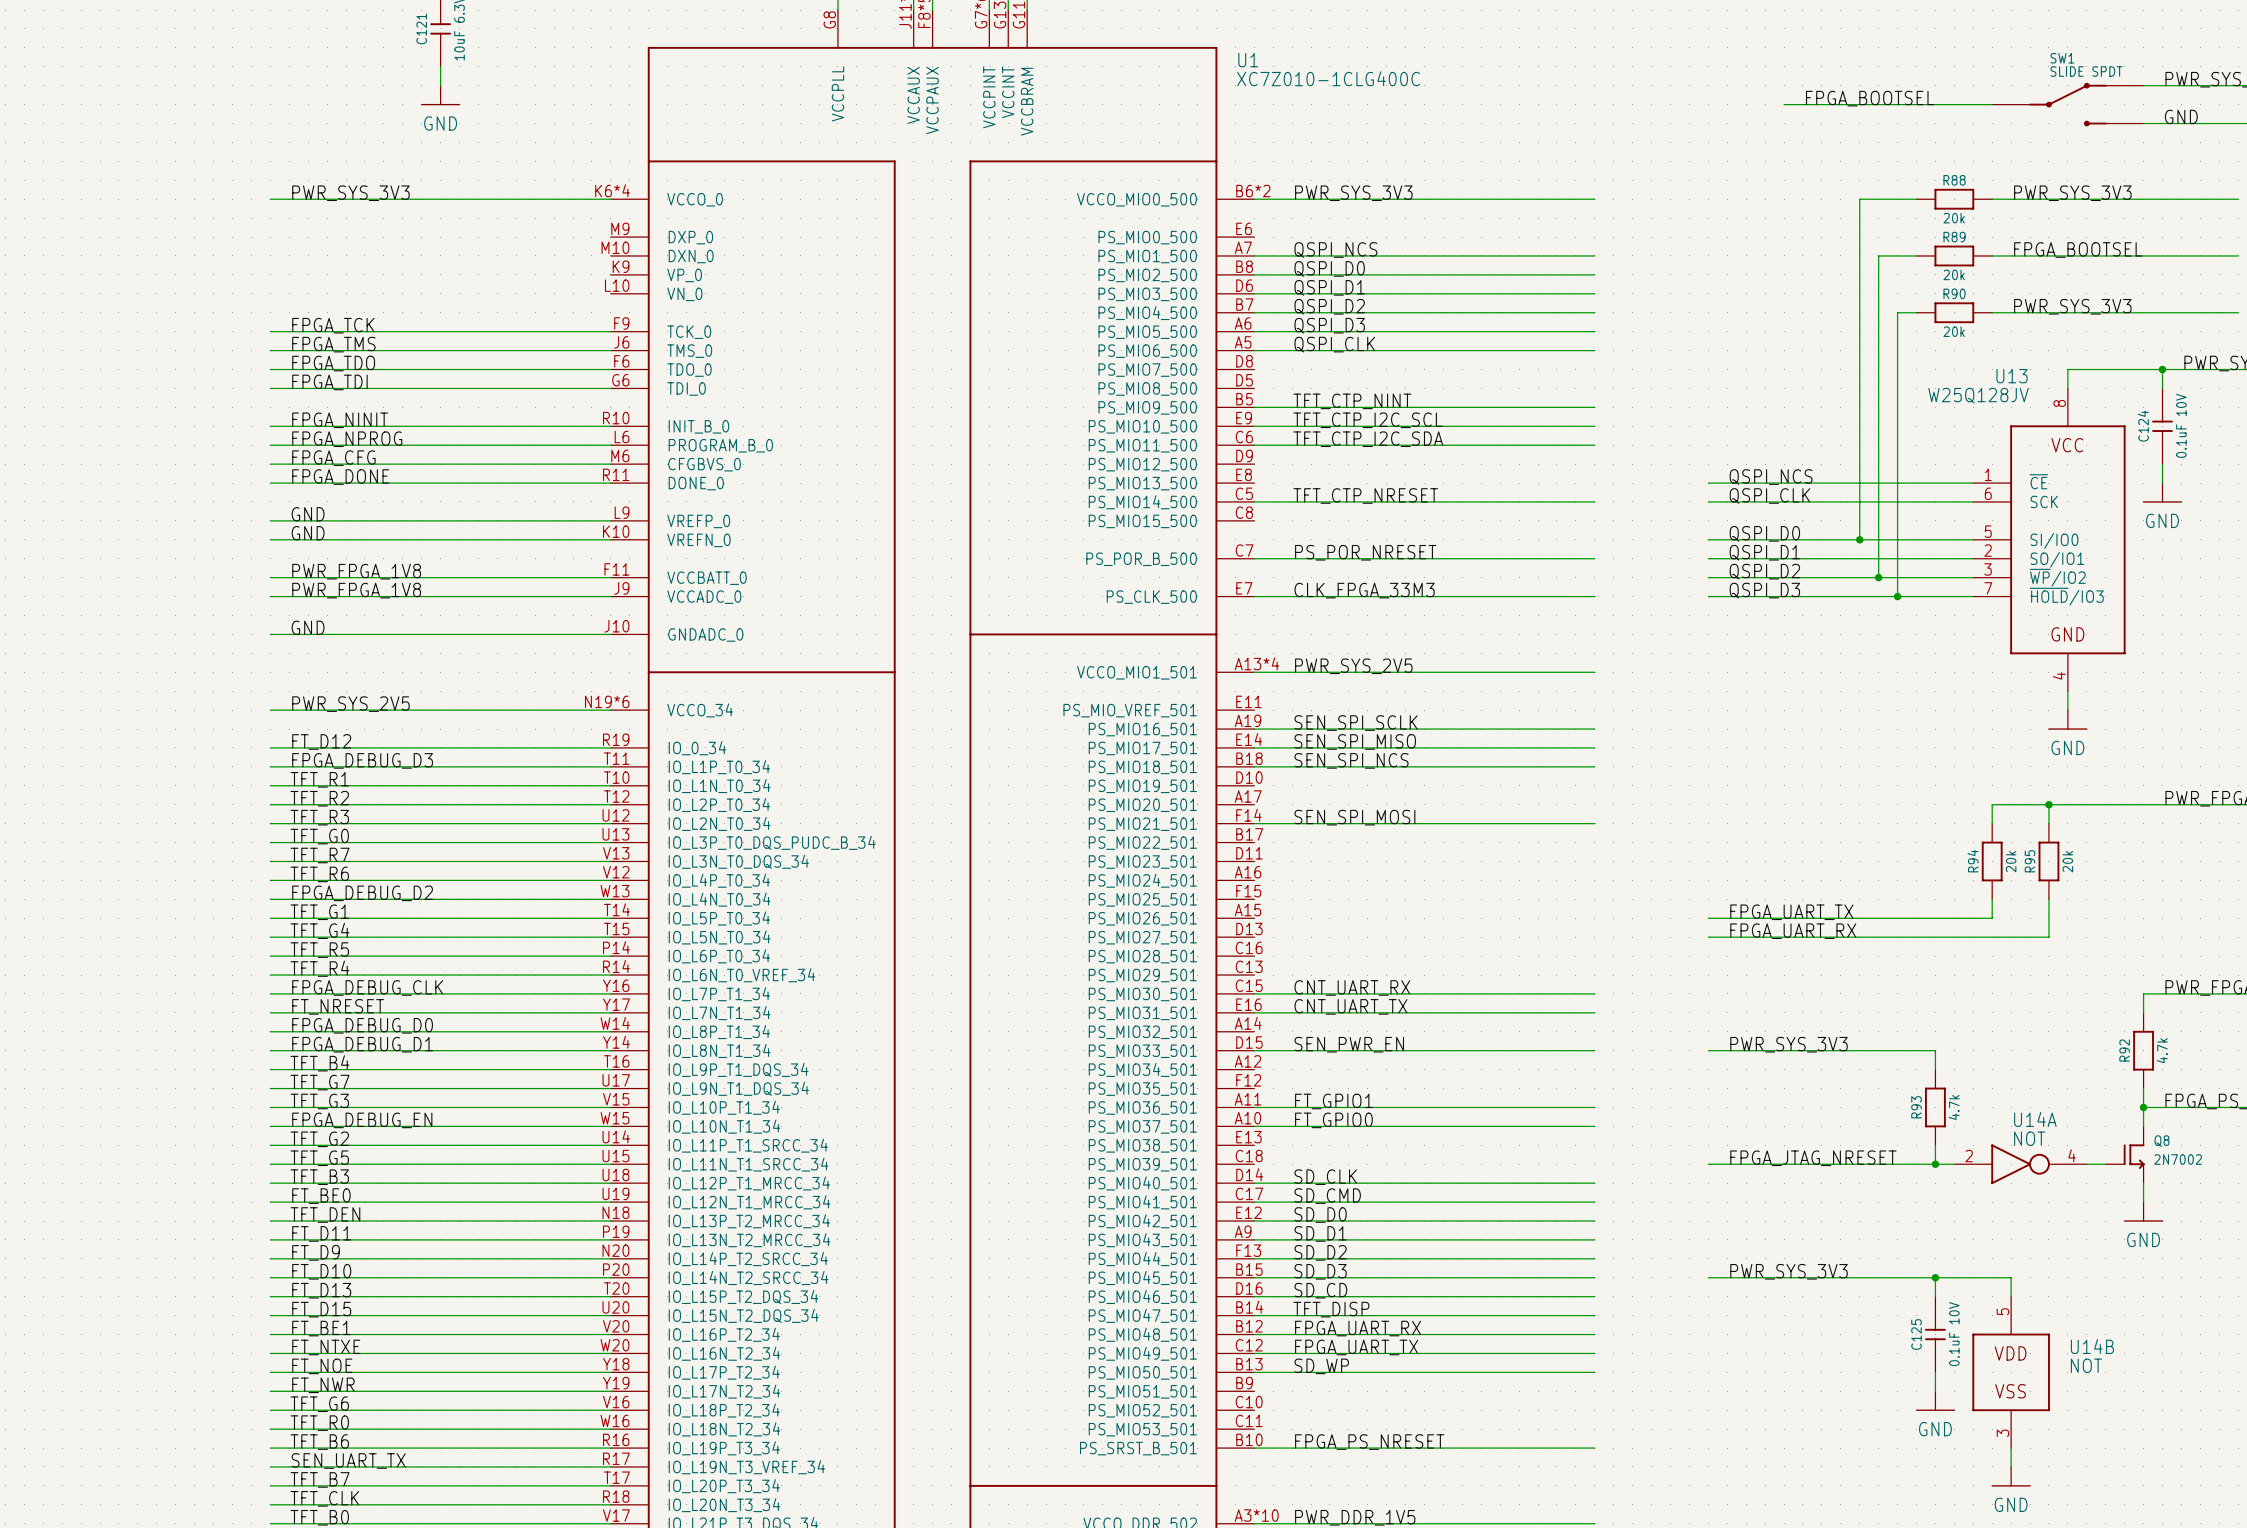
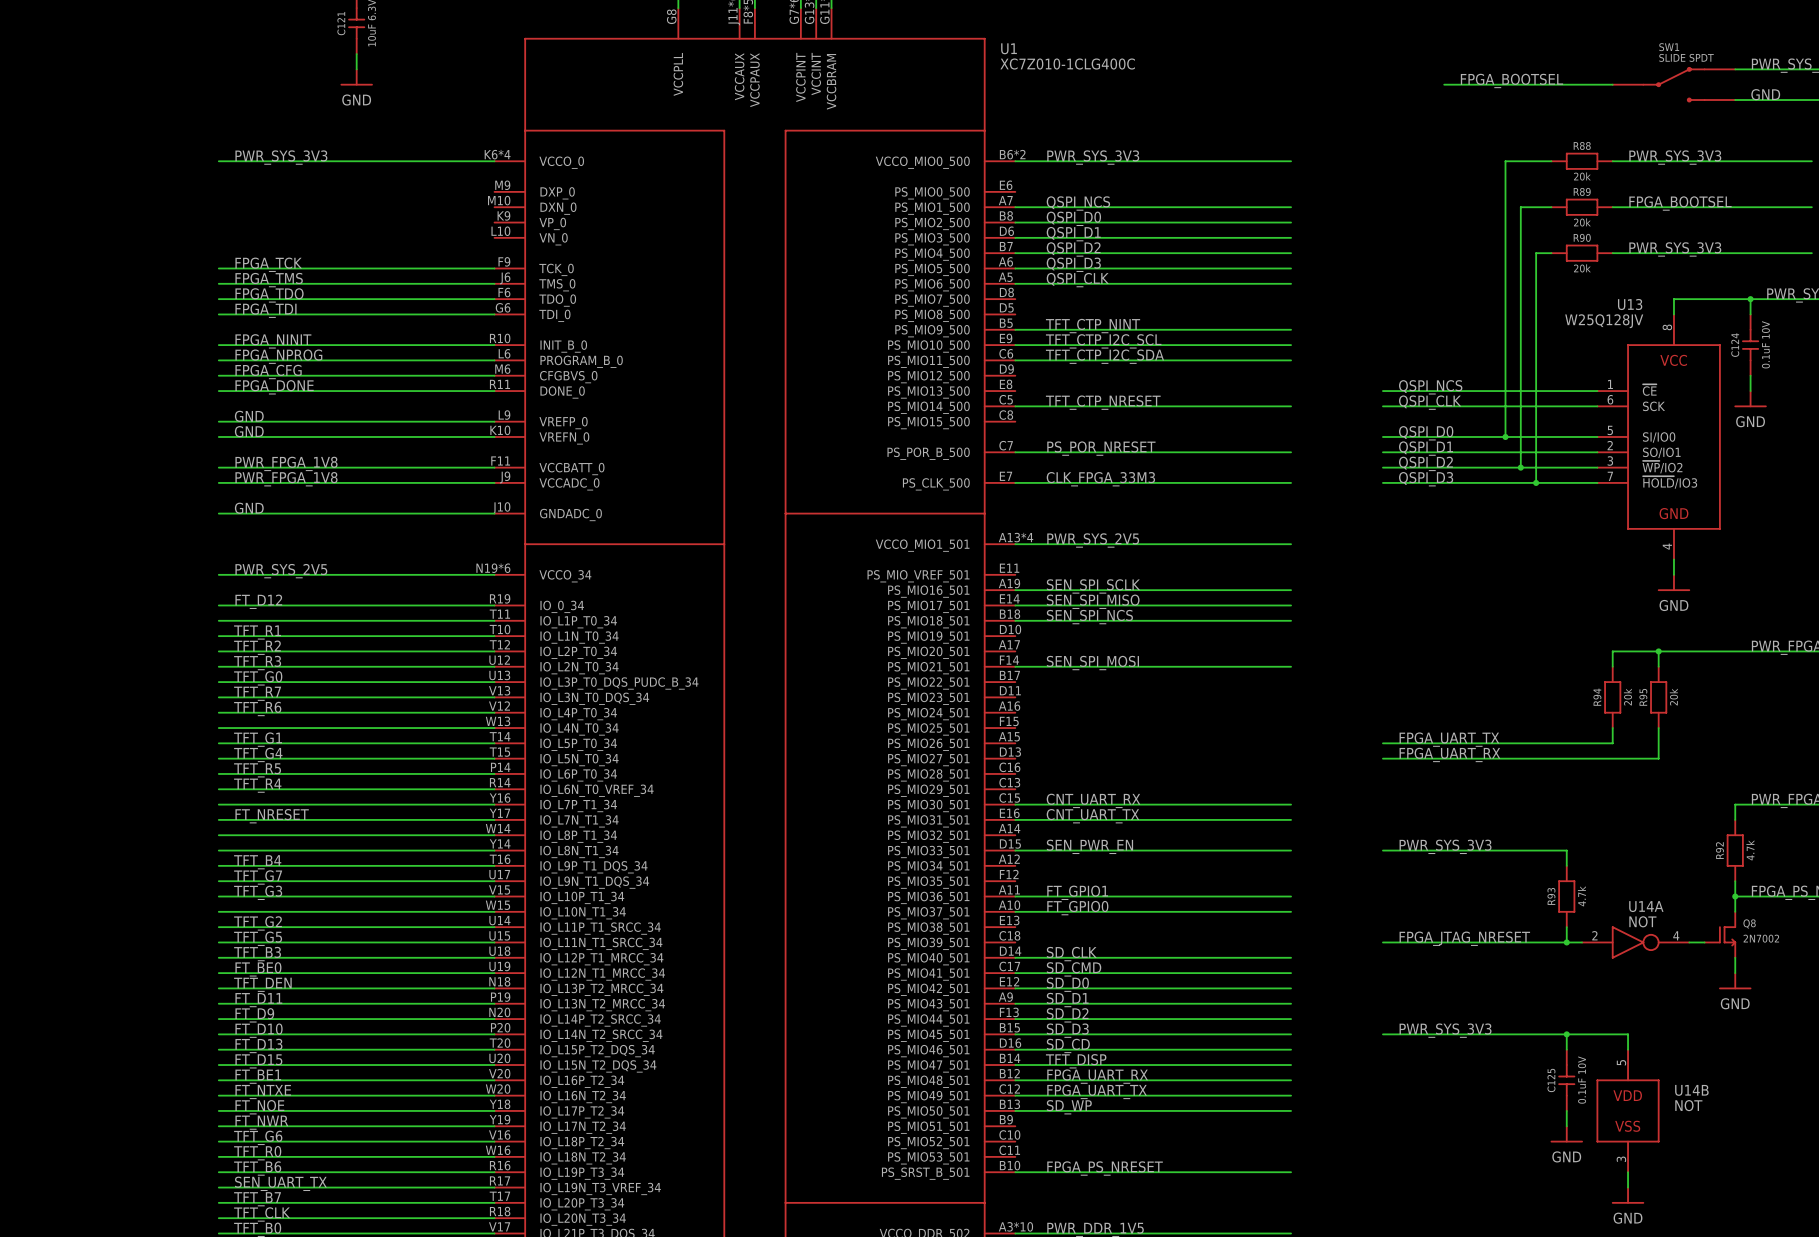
label: FPGA_DEBUG_D3 (362, 760) -> none
label: FPGA_DEBUG_D2 (362, 893) -> none
label: FPGA_DEBUG_CLK (367, 987) -> none
label: FPGA_DEBUG_D0 (362, 1025) -> none
label: FPGA_DEBUG_D1 (362, 1044) -> none
label: FPGA_DEBUG_EN (362, 1120) -> none

